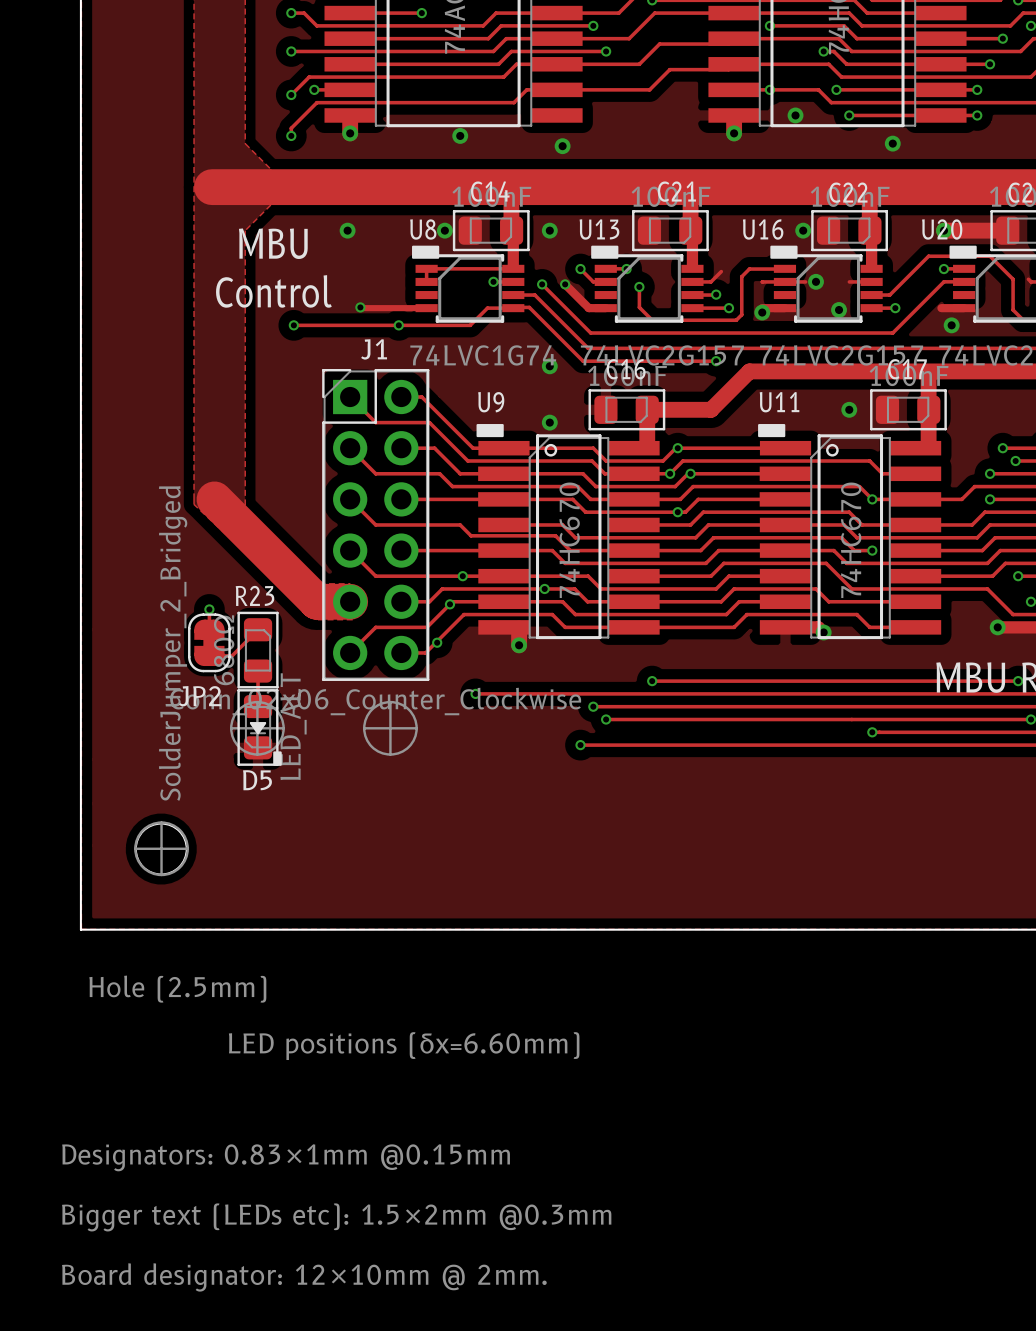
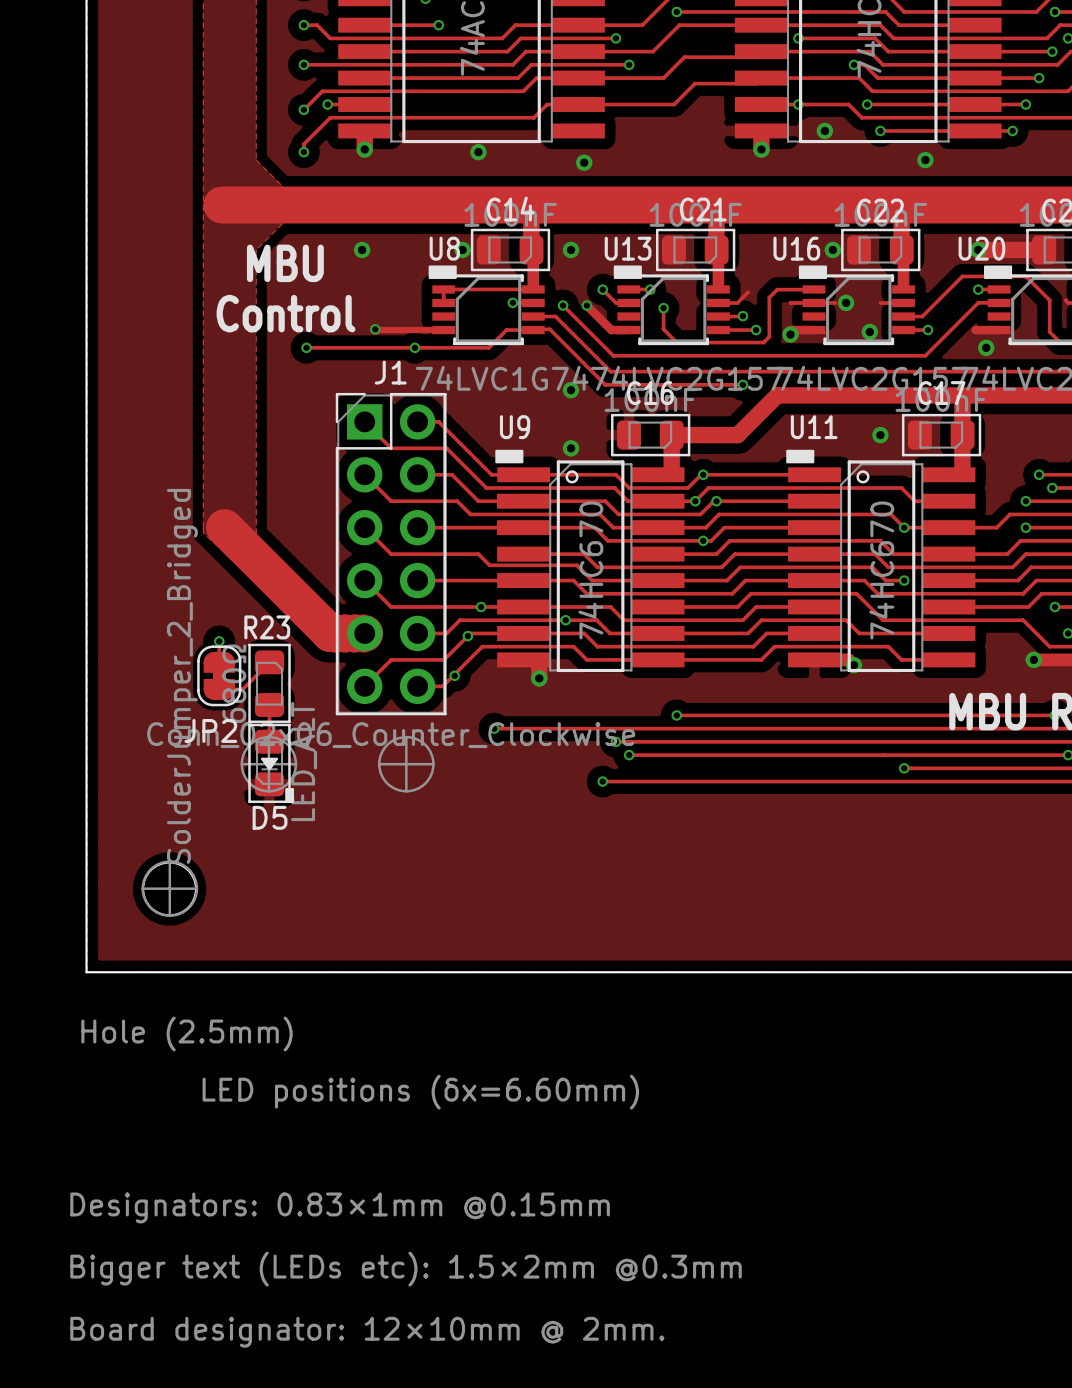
track: none -> (1039, 51) (1052, 51)
via: (1002, 38) -> none
via: none -> (1052, 51)
track: none -> (1025, 78) (1039, 78)
via: (990, 64) -> none
via: none -> (1039, 78)
track: none -> (1012, 104) (1025, 104)
via: (977, 89) -> none
via: none -> (1025, 104)

